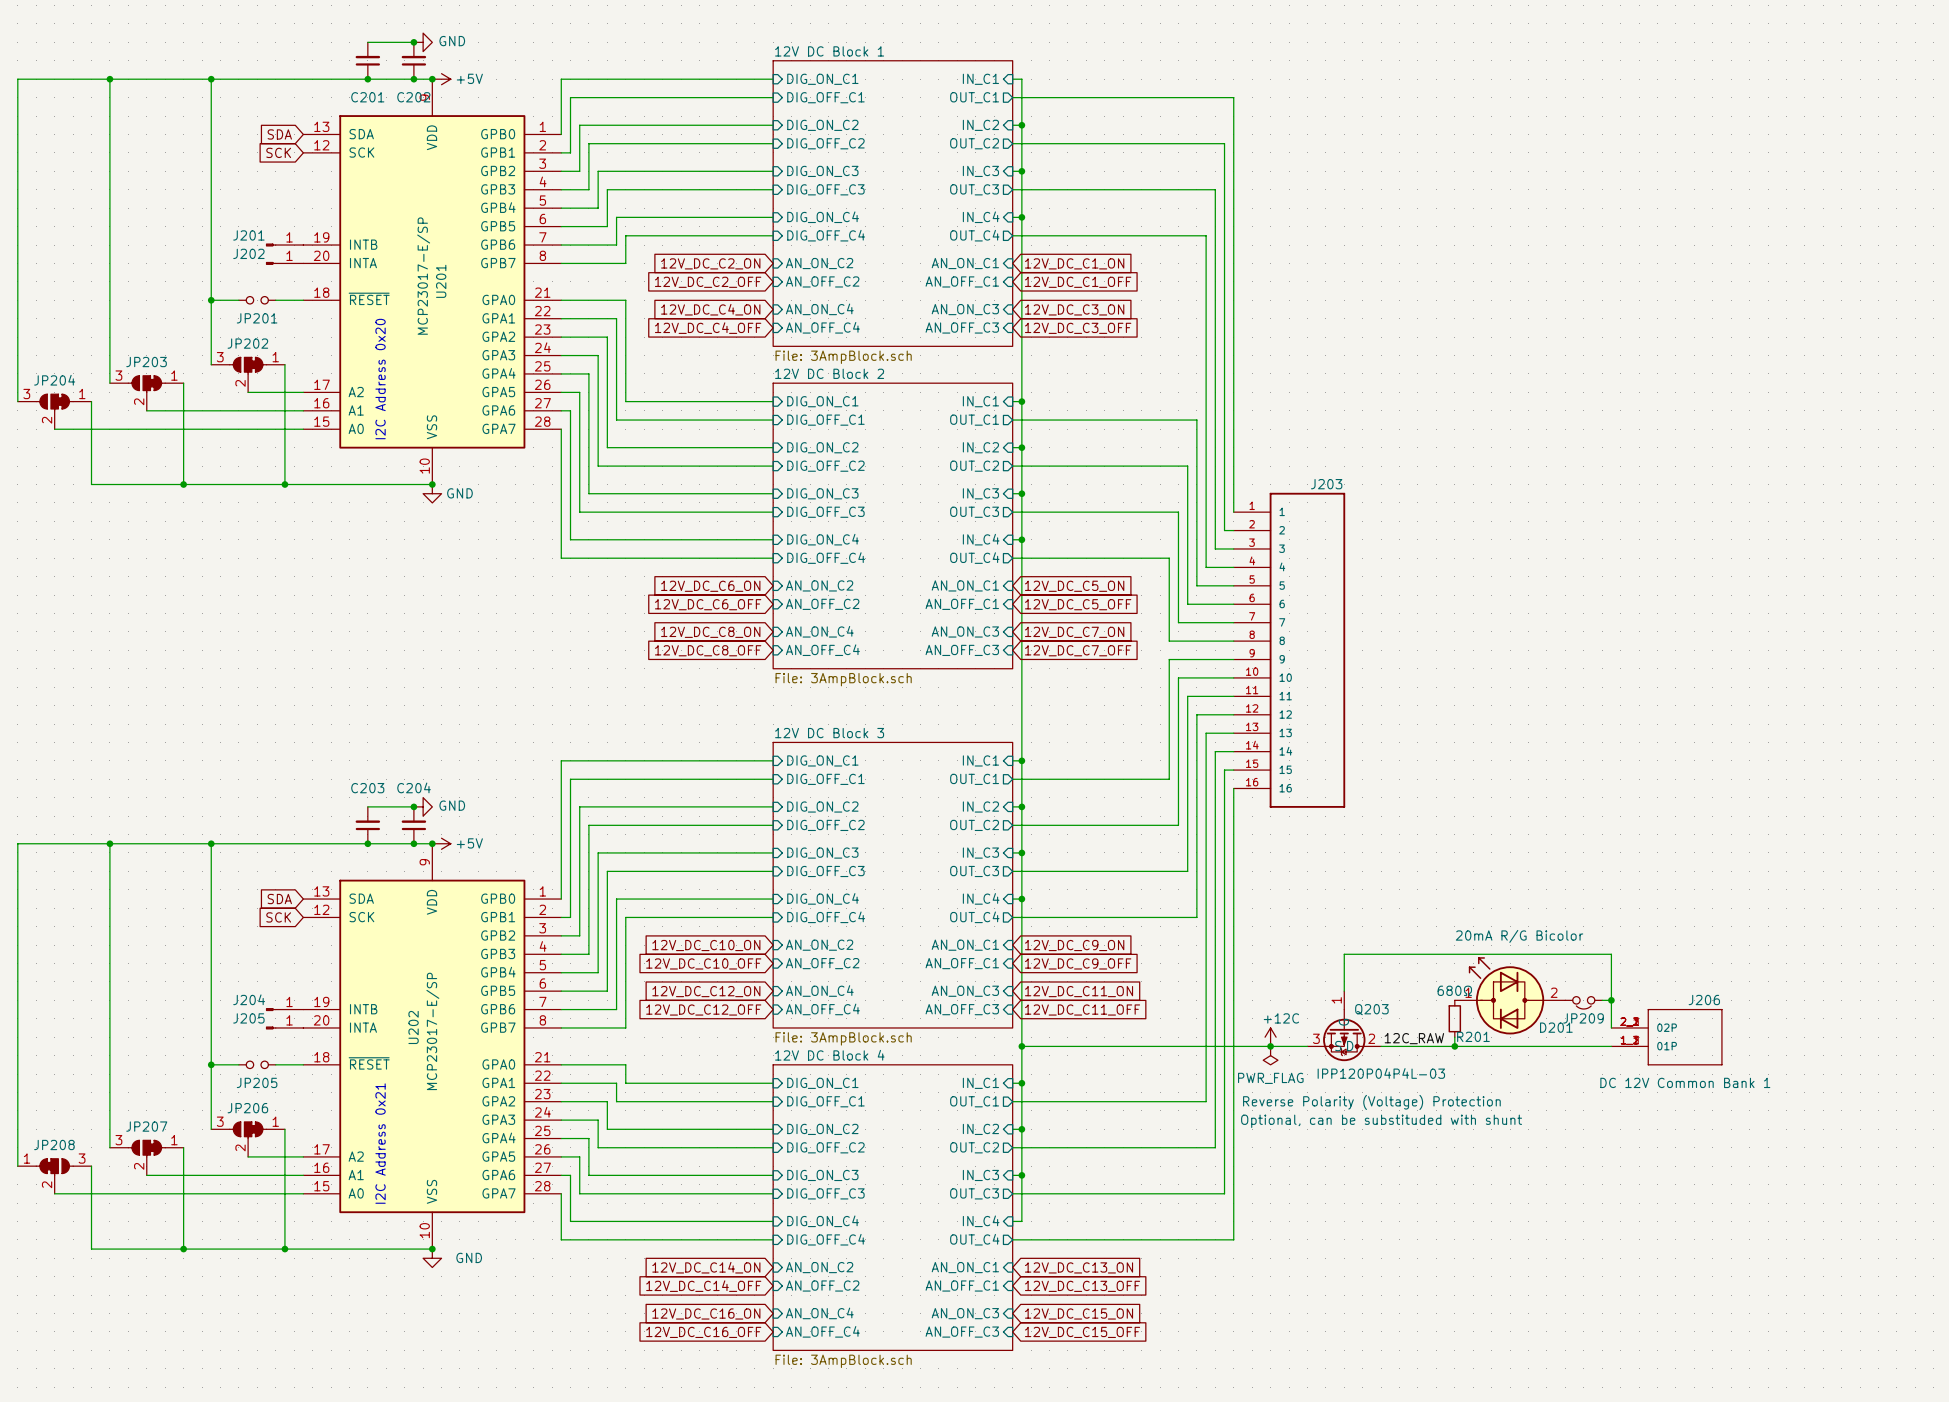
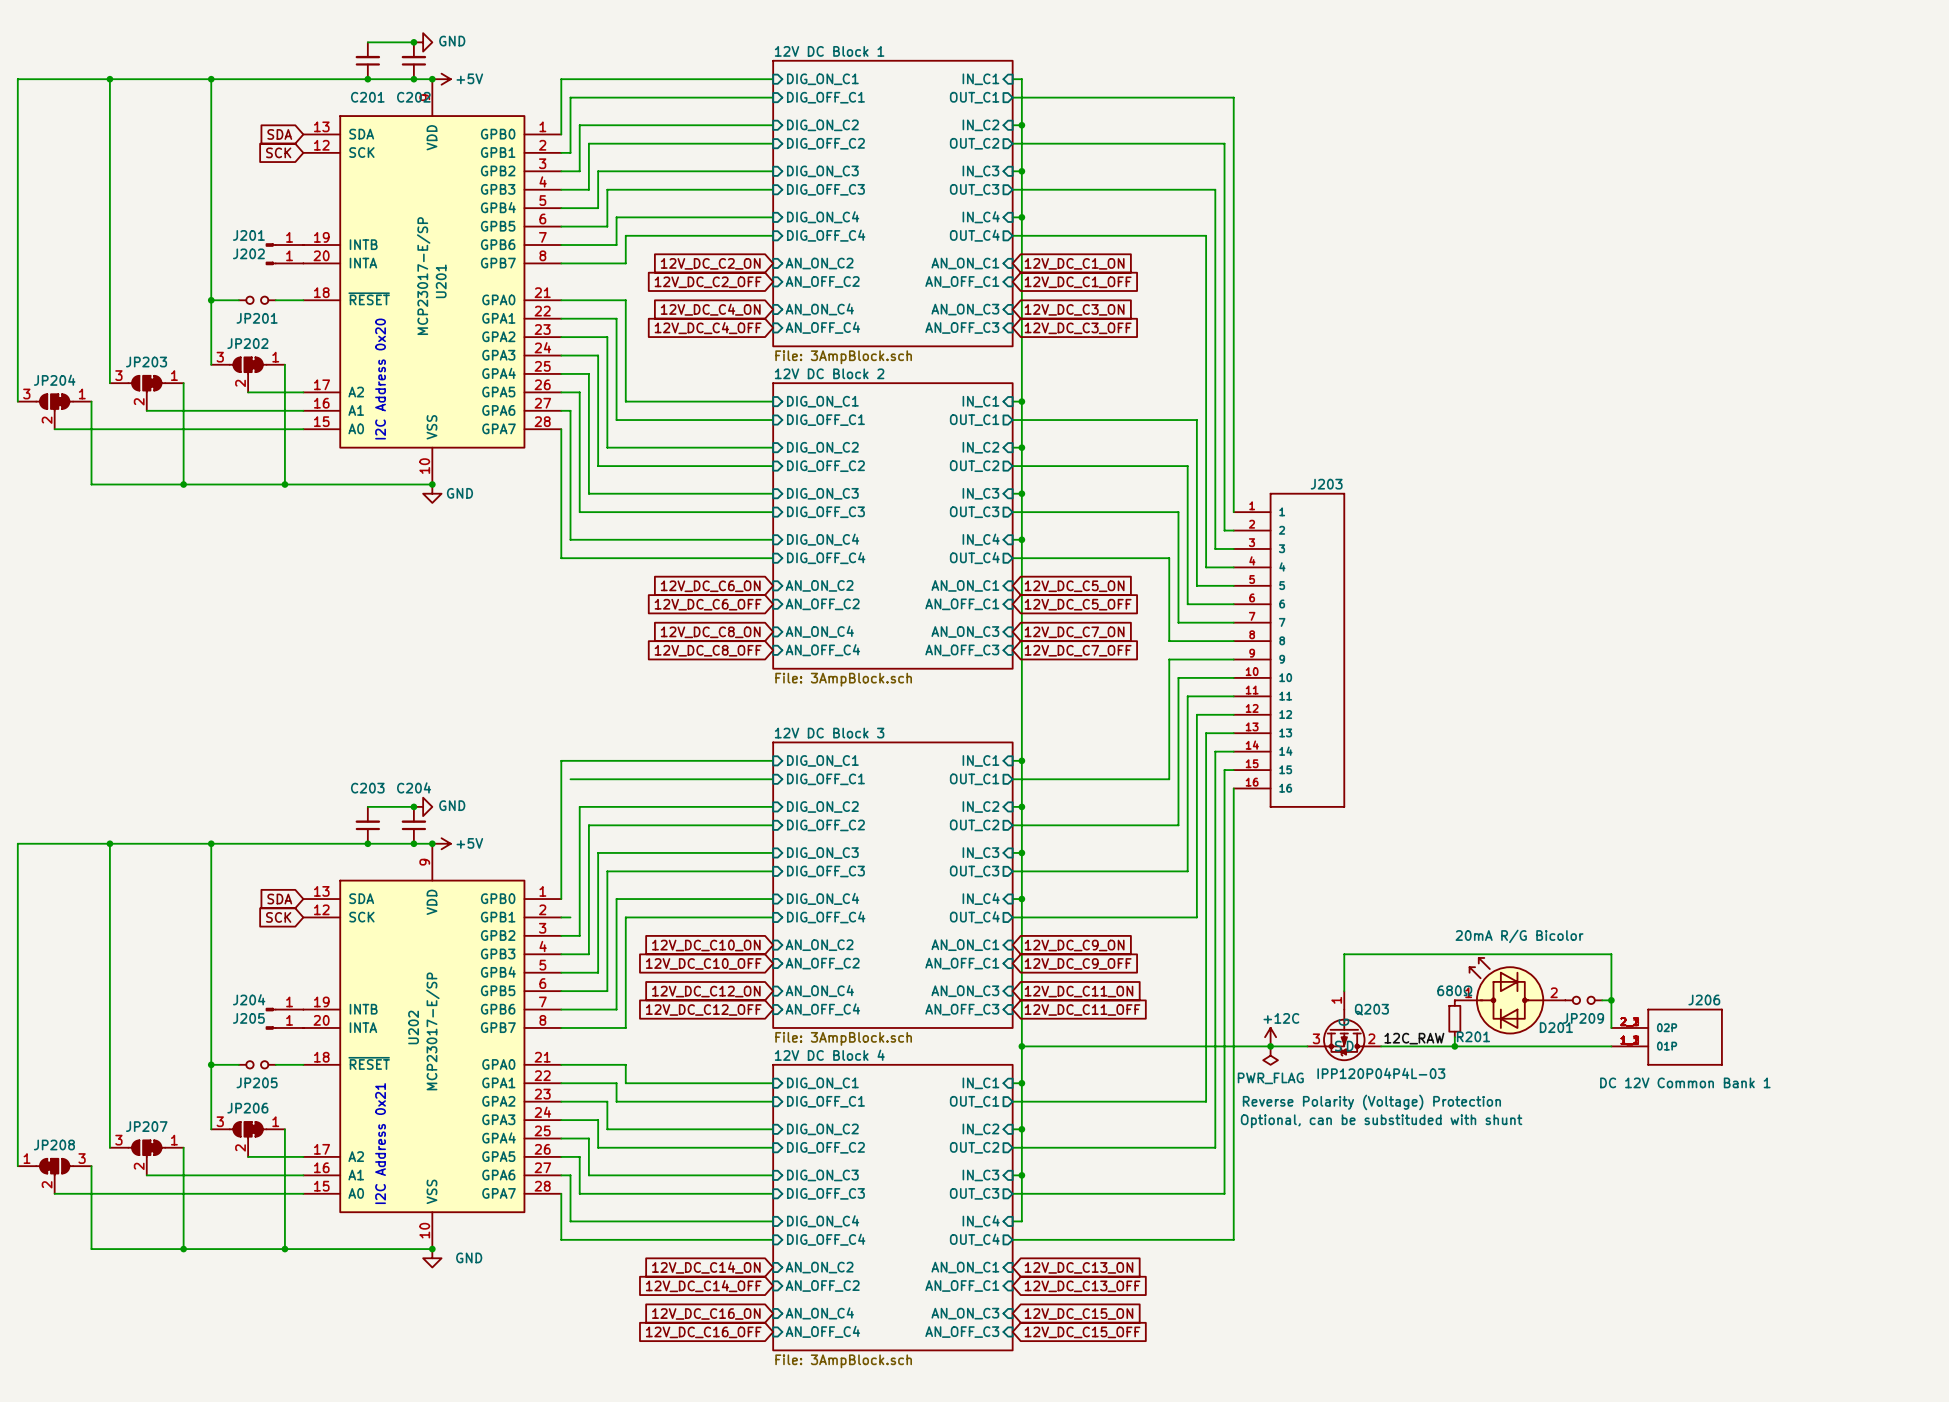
wire: (570, 779) (570, 917) -> none
JP209 symbol: [1565, 996, 1603, 1010] -> [1565, 996, 1603, 1005]

